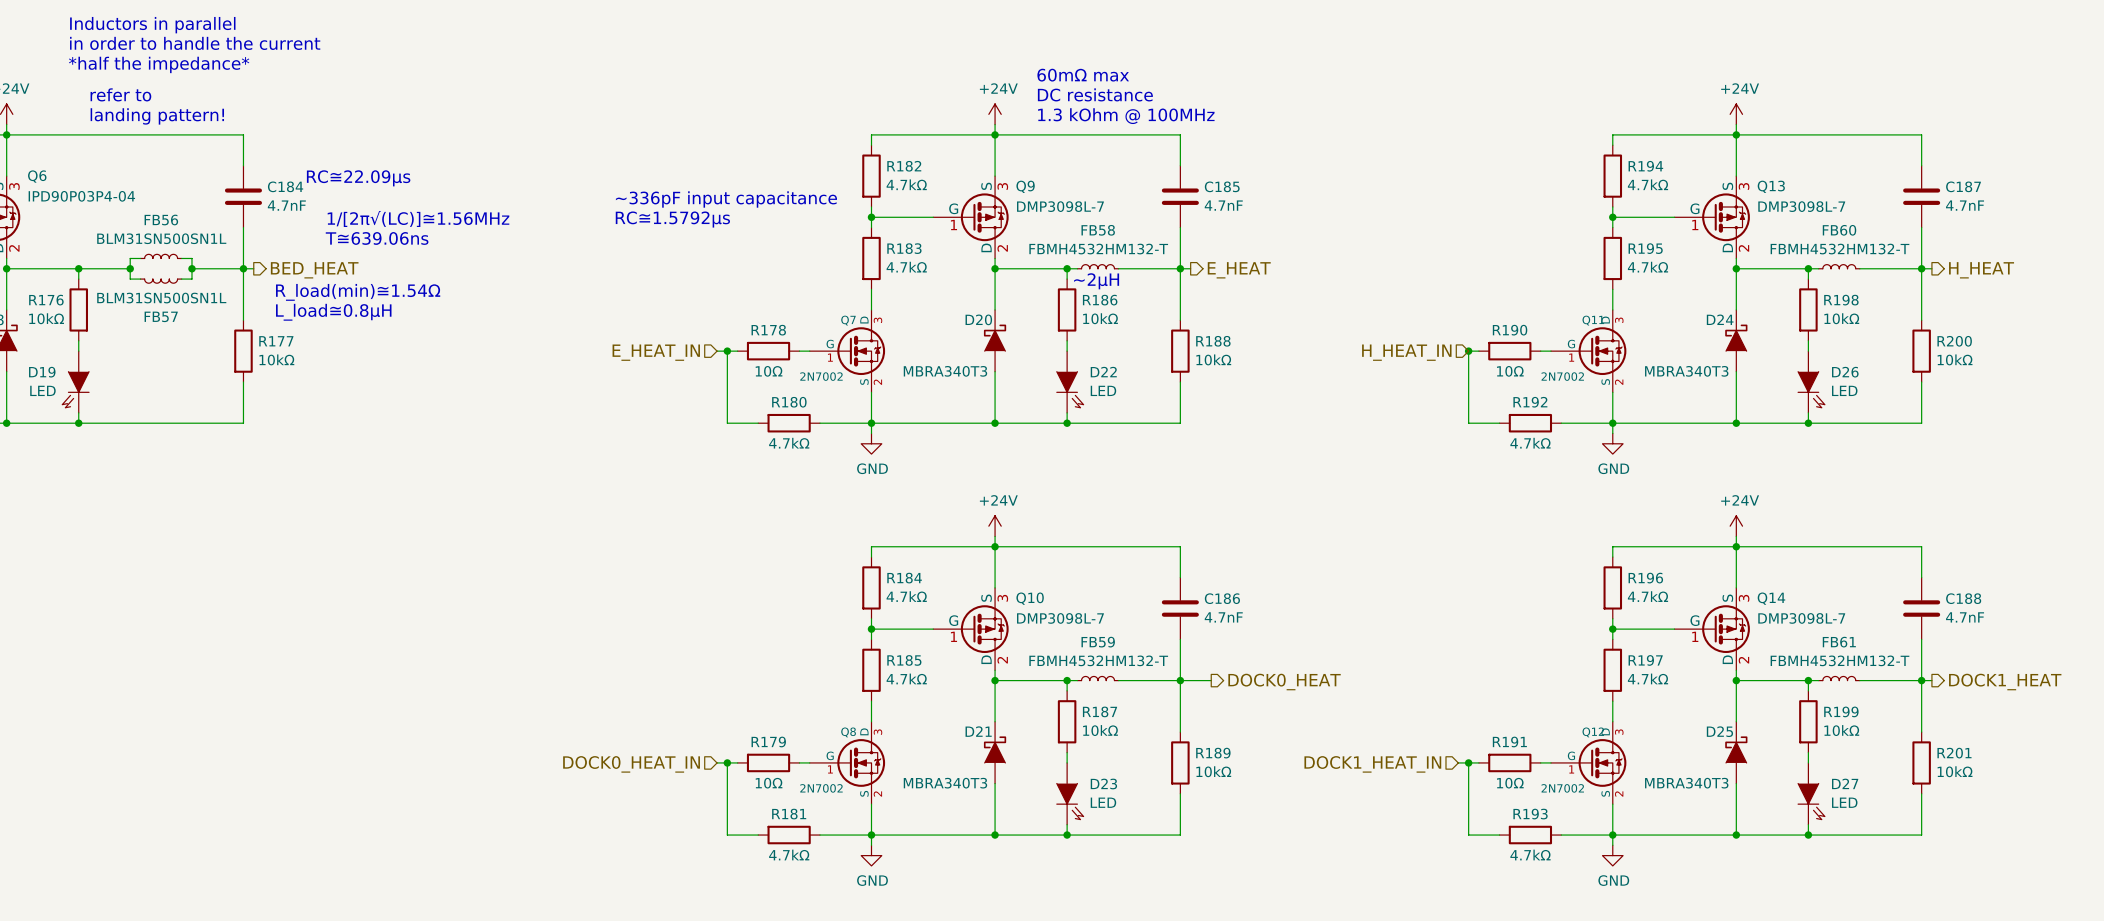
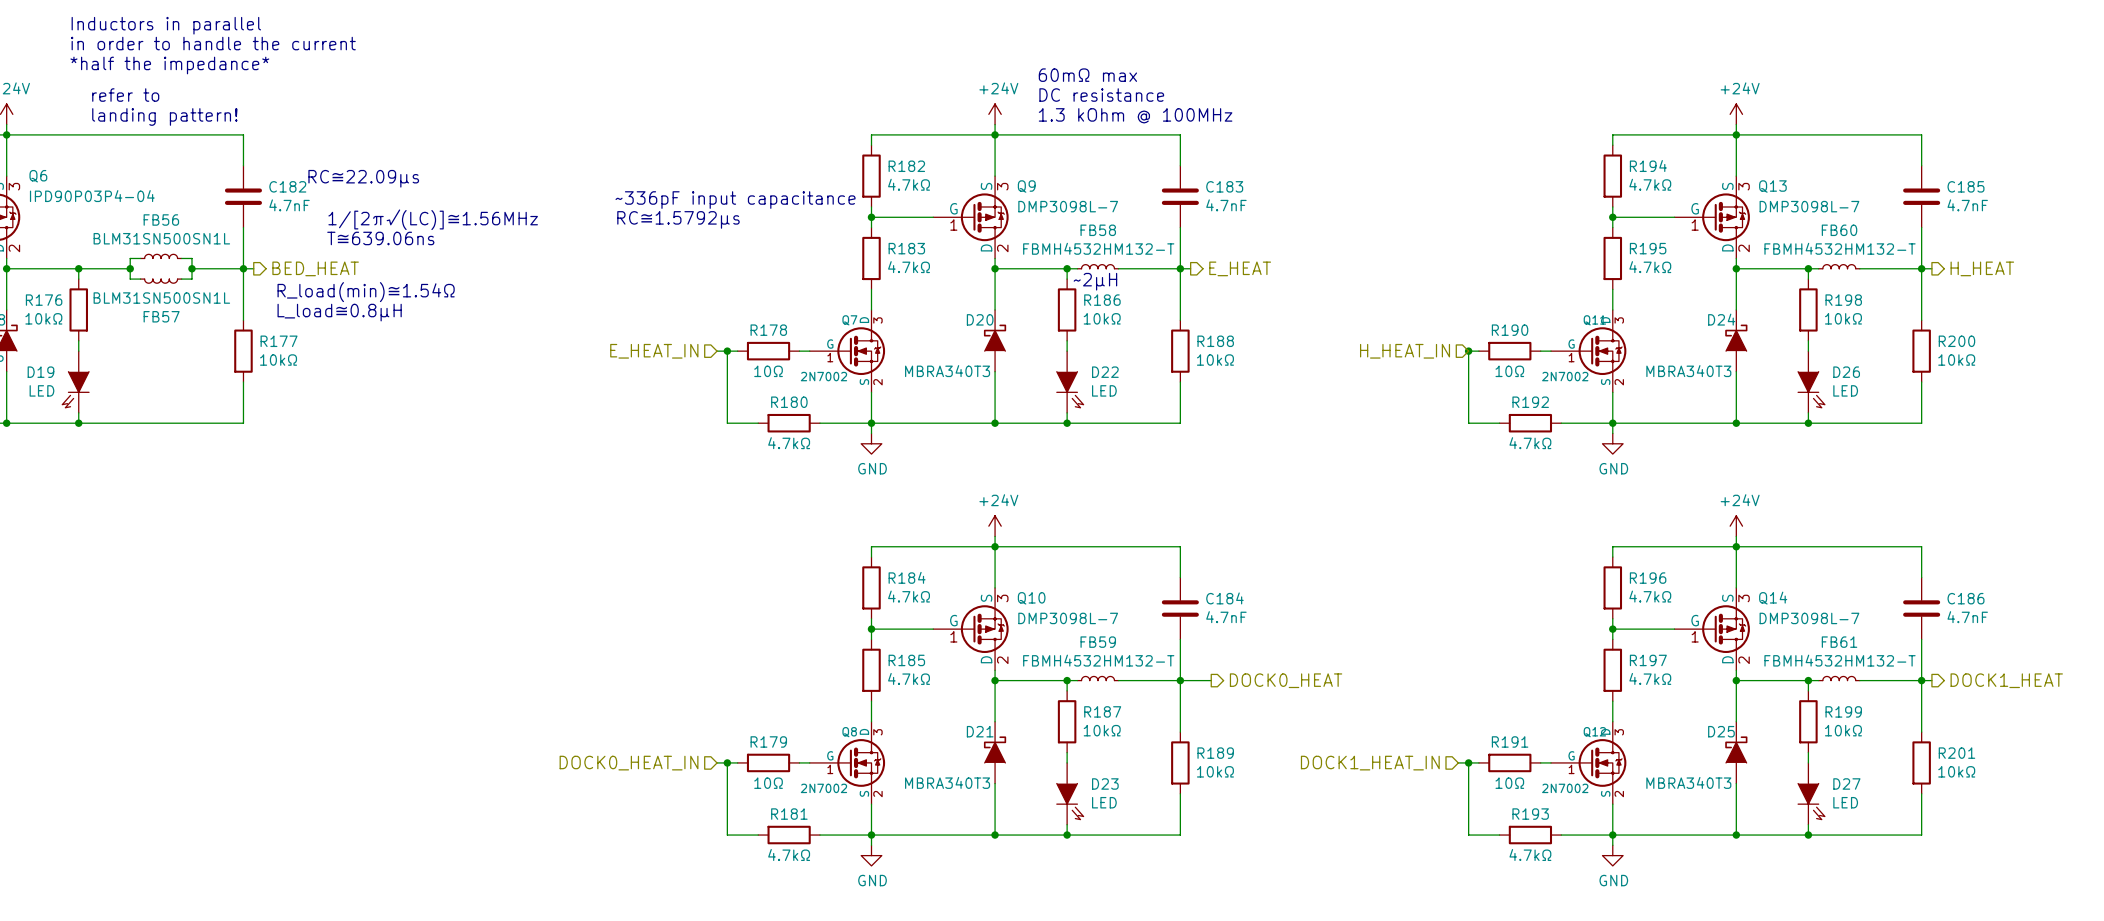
C184 name: C184 (285, 186) -> C182 (287, 186)
C185 name: C185 (1222, 186) -> C183 (1224, 186)
C187 name: C187 (1963, 186) -> C185 (1965, 186)
C186 name: C186 (1222, 598) -> C184 (1224, 598)
C188 name: C188 (1963, 598) -> C186 (1965, 598)

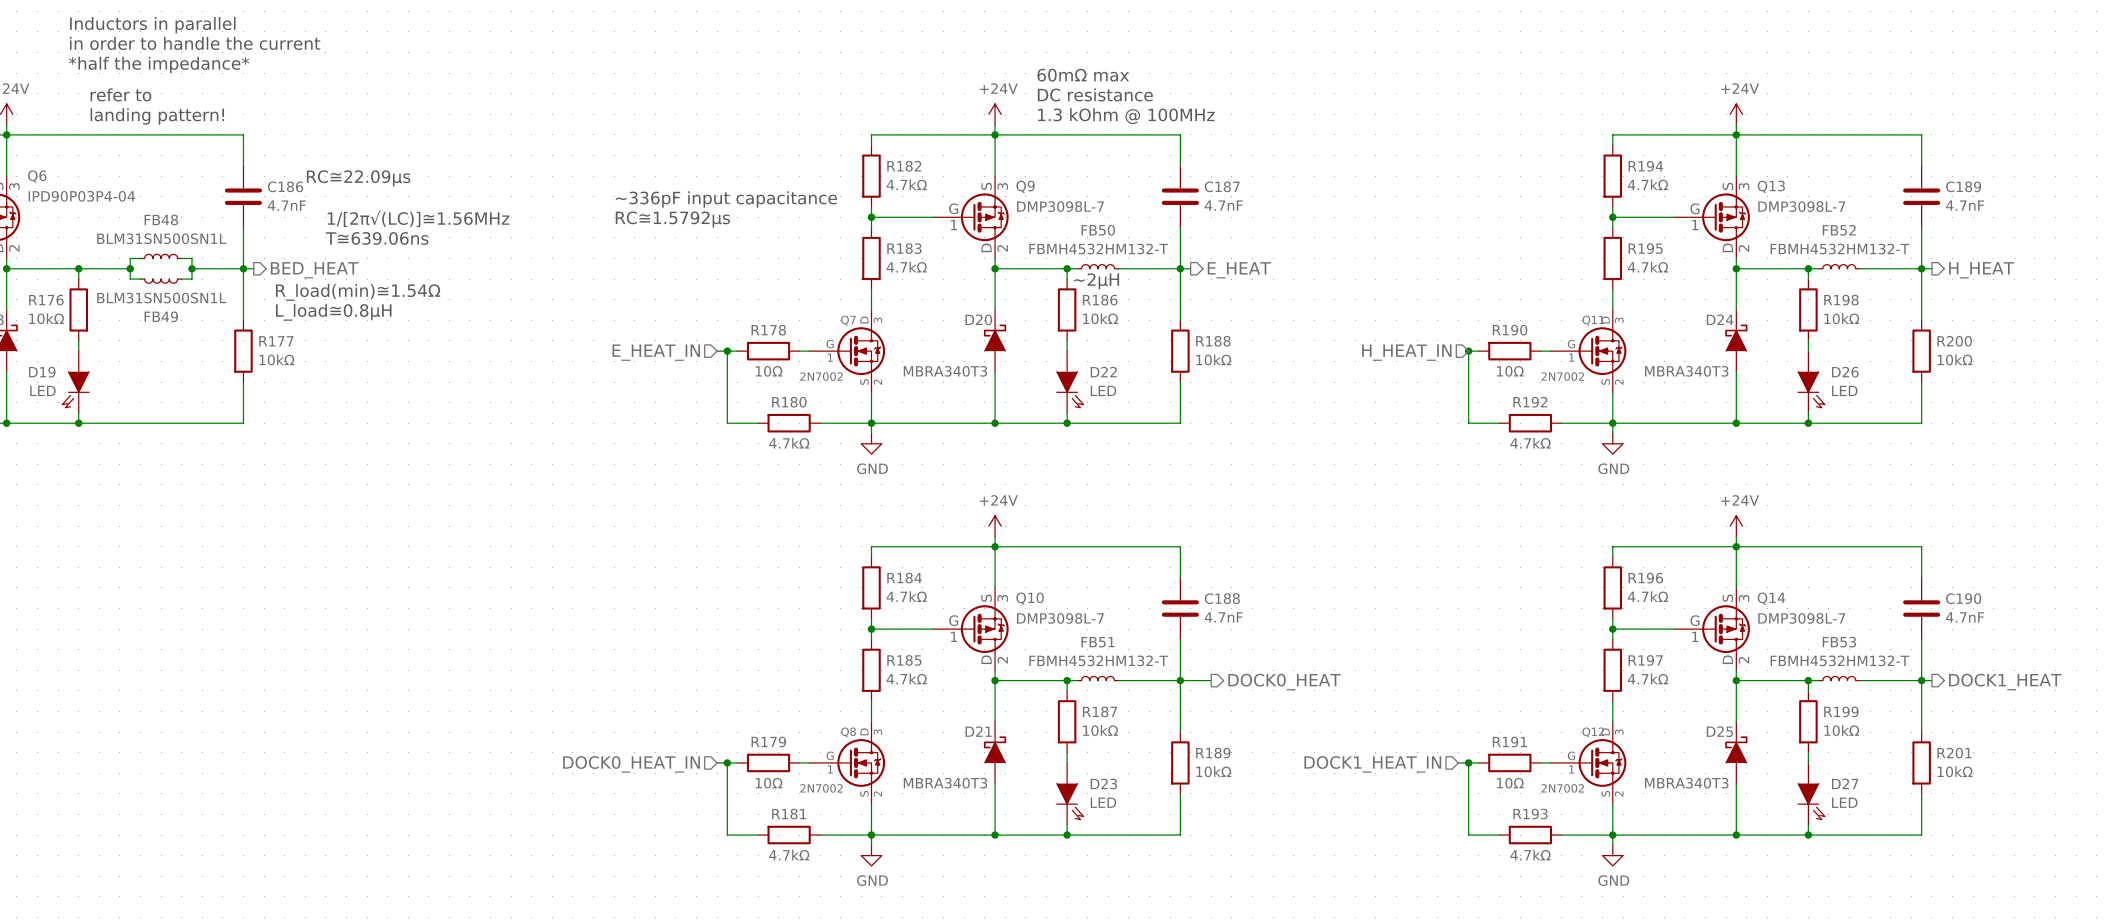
C182 name: C182 (287, 186) -> C186 (285, 186)
C183 name: C183 (1224, 186) -> C187 (1222, 186)
C185 name: C185 (1965, 186) -> C189 (1963, 186)
FB56 name: FB56 (161, 219) -> FB48 (161, 220)
FB58 name: FB58 (1098, 230) -> FB50 (1098, 230)
FB60 name: FB60 (1839, 230) -> FB52 (1839, 230)
FB57 name: FB57 (161, 316) -> FB49 (161, 316)
C184 name: C184 (1224, 598) -> C188 (1222, 598)
C186 name: C186 (1965, 598) -> C190 (1963, 598)
FB59 name: FB59 (1098, 642) -> FB51 (1098, 642)
FB61 name: FB61 (1839, 642) -> FB53 (1839, 642)

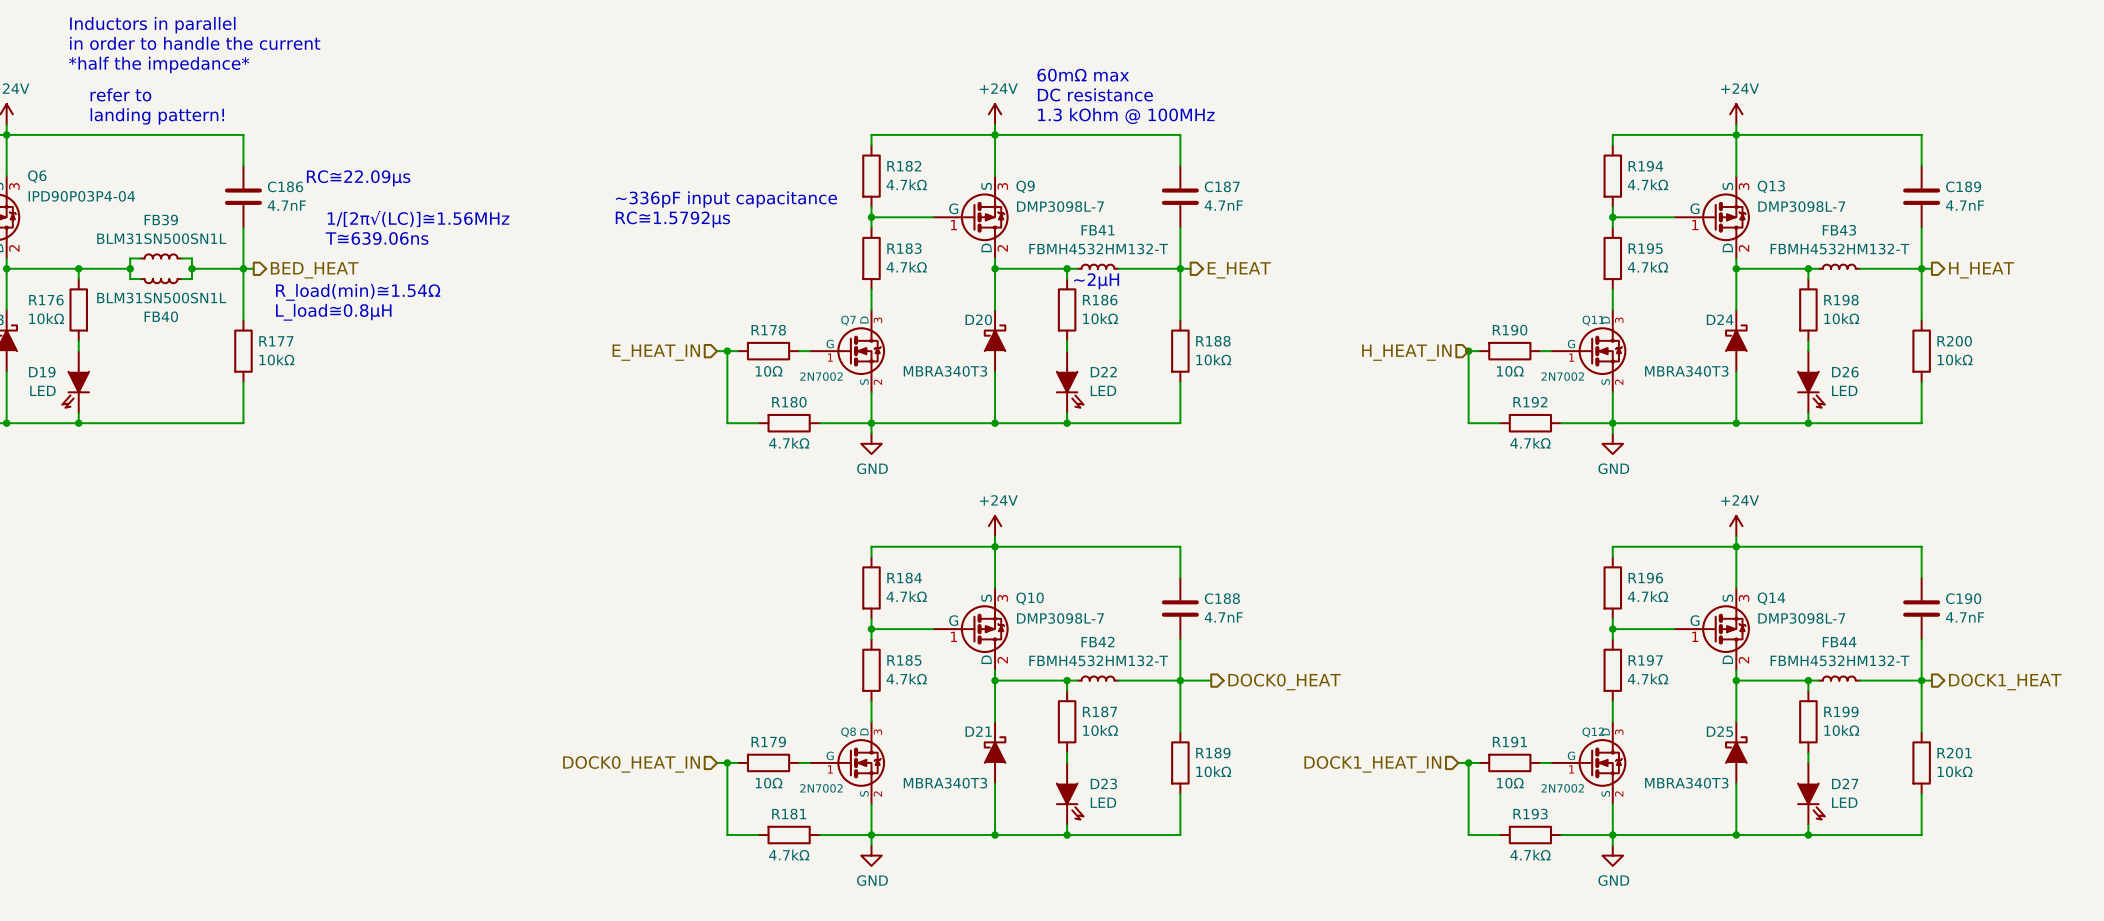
FB48 name: FB48 (161, 220) -> FB39 (161, 220)
FB50 name: FB50 (1098, 230) -> FB41 (1098, 230)
FB52 name: FB52 (1839, 230) -> FB43 (1839, 230)
FB49 name: FB49 (161, 316) -> FB40 (161, 316)
FB51 name: FB51 (1098, 642) -> FB42 (1097, 642)
FB53 name: FB53 (1839, 642) -> FB44 (1839, 642)

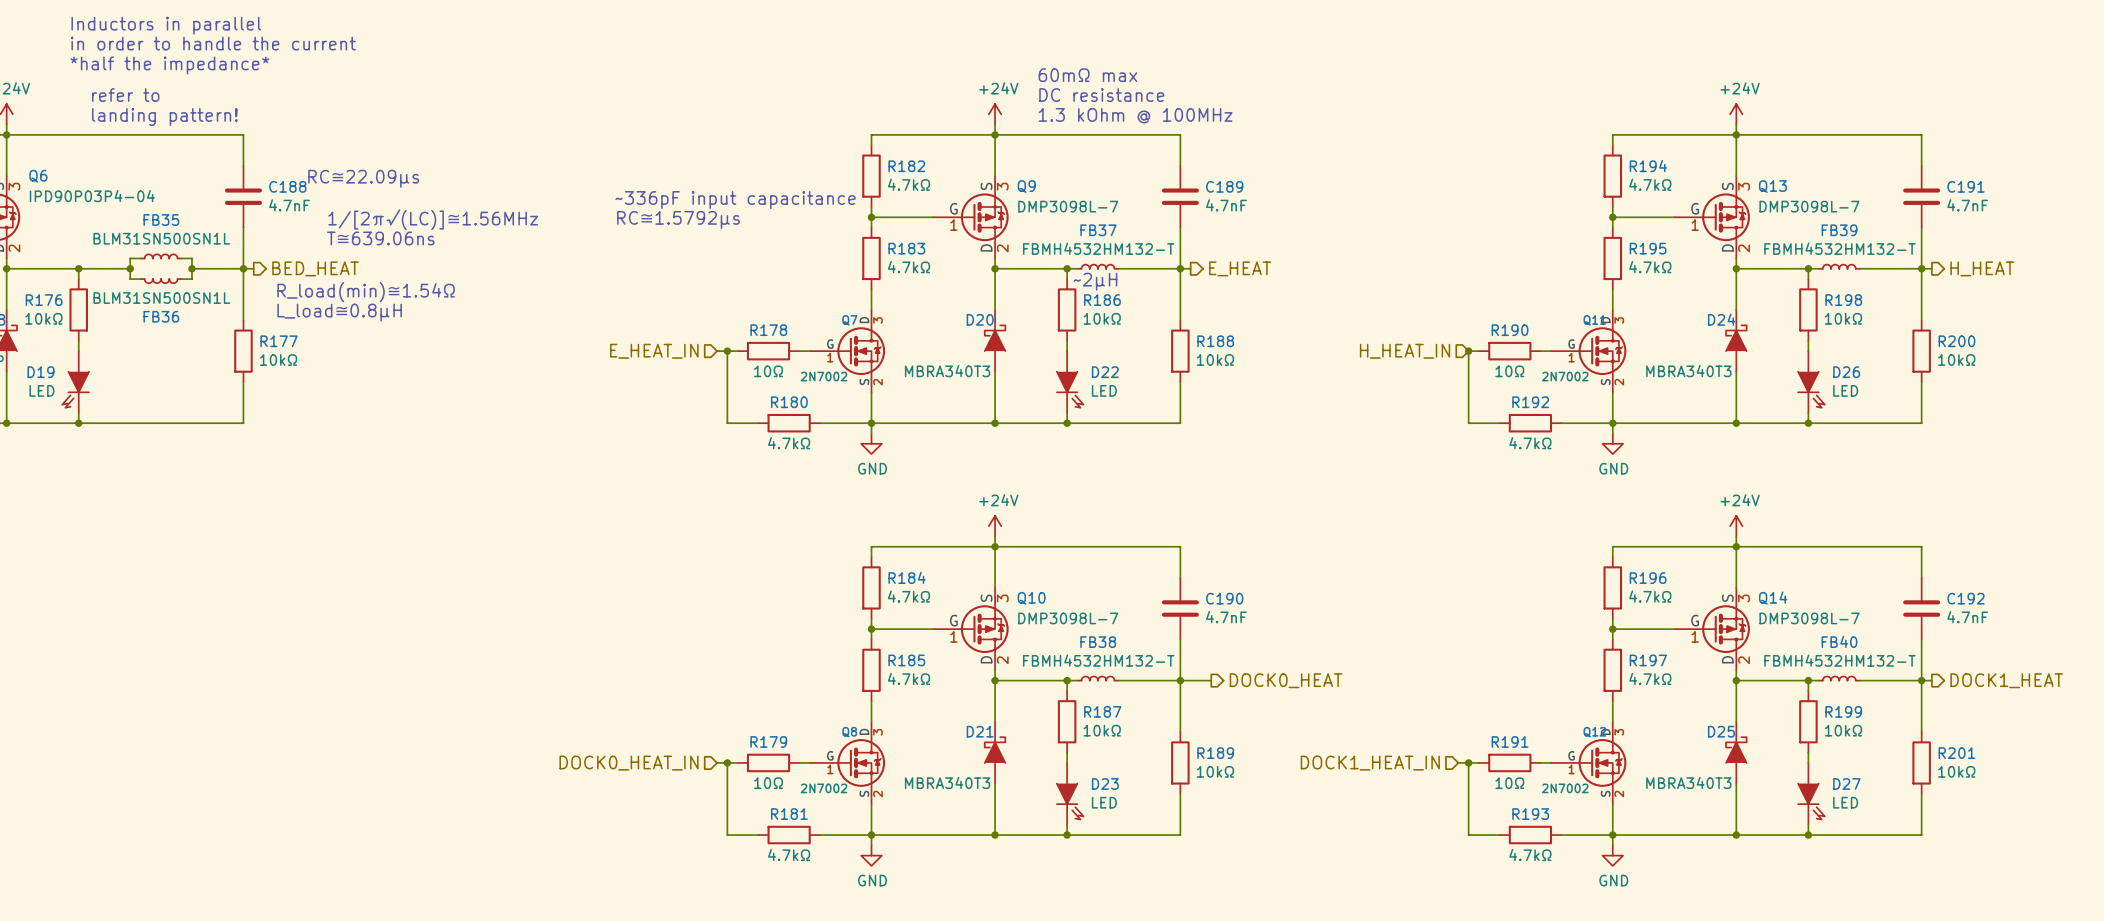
C186 name: C186 (285, 186) -> C188 (287, 186)
C187 name: C187 (1222, 186) -> C189 (1224, 186)
C189 name: C189 (1963, 186) -> C191 (1965, 186)
FB39 name: FB39 (161, 220) -> FB35 (161, 219)
FB41 name: FB41 (1098, 230) -> FB37 (1098, 230)
FB43 name: FB43 (1839, 230) -> FB39 (1839, 230)
FB40 name: FB40 (161, 316) -> FB36 (161, 316)
C188 name: C188 (1222, 598) -> C190 (1224, 598)
C190 name: C190 (1963, 598) -> C192 (1965, 598)
FB42 name: FB42 (1097, 642) -> FB38 (1098, 642)
FB44 name: FB44 (1839, 642) -> FB40 (1839, 641)

